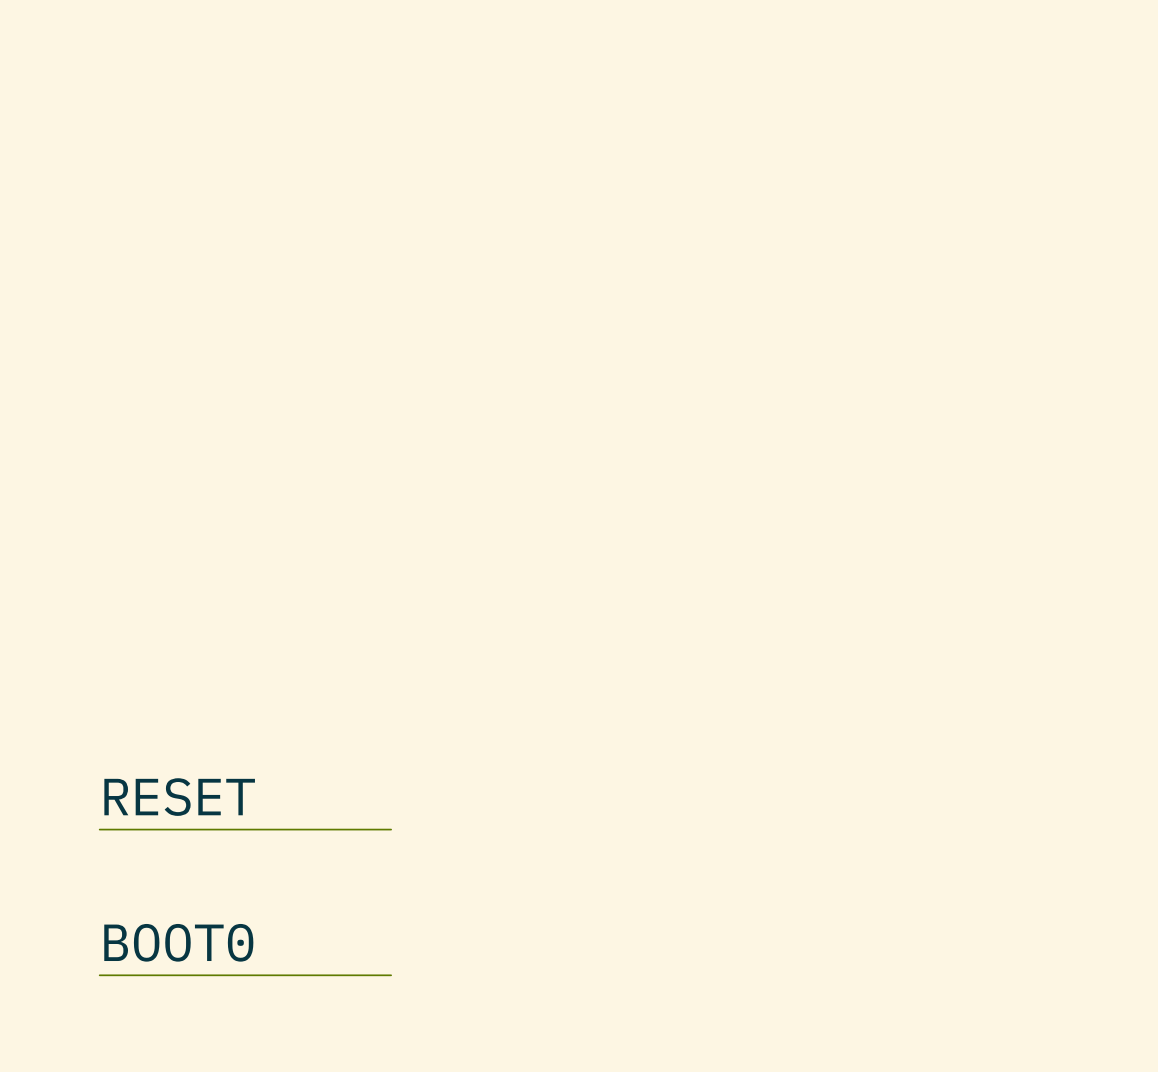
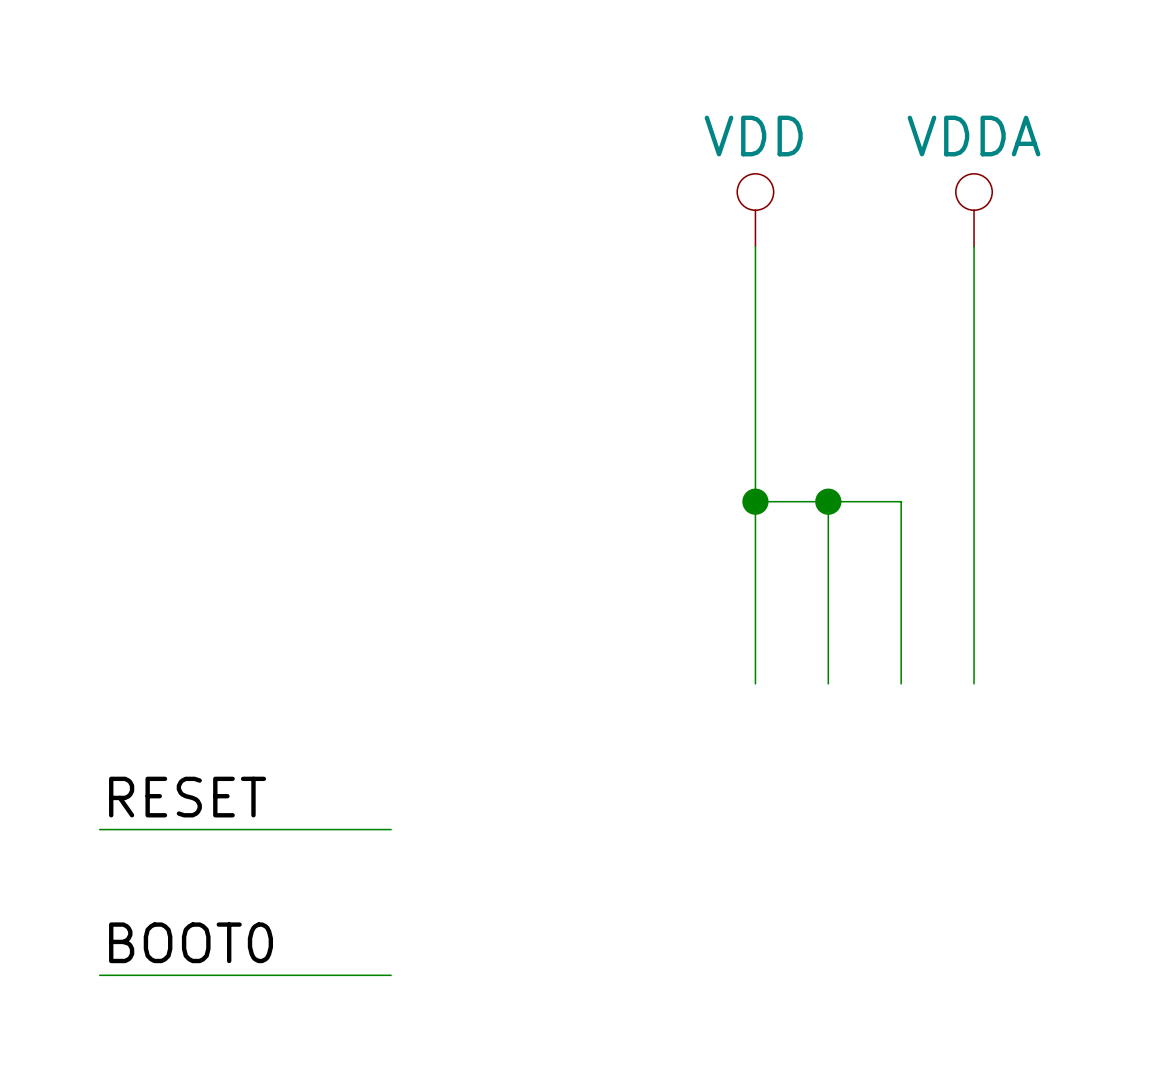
power symbol: none -> VDD (755, 210)
power symbol: none -> VDDA (974, 210)
wire: none -> (755, 246) (755, 683)
wire: none -> (974, 246) (974, 683)
wire: none -> (755, 501) (901, 501) (901, 683)
junction: none -> (755, 501)
wire: none -> (828, 501) (828, 683)
junction: none -> (828, 501)

